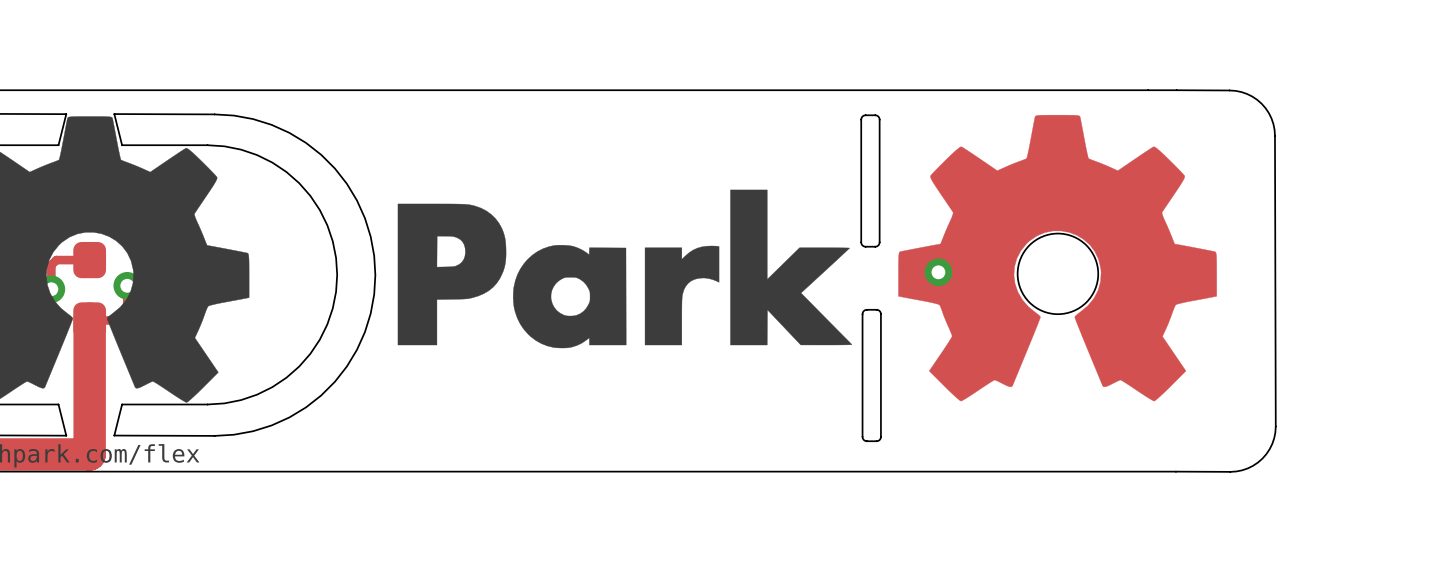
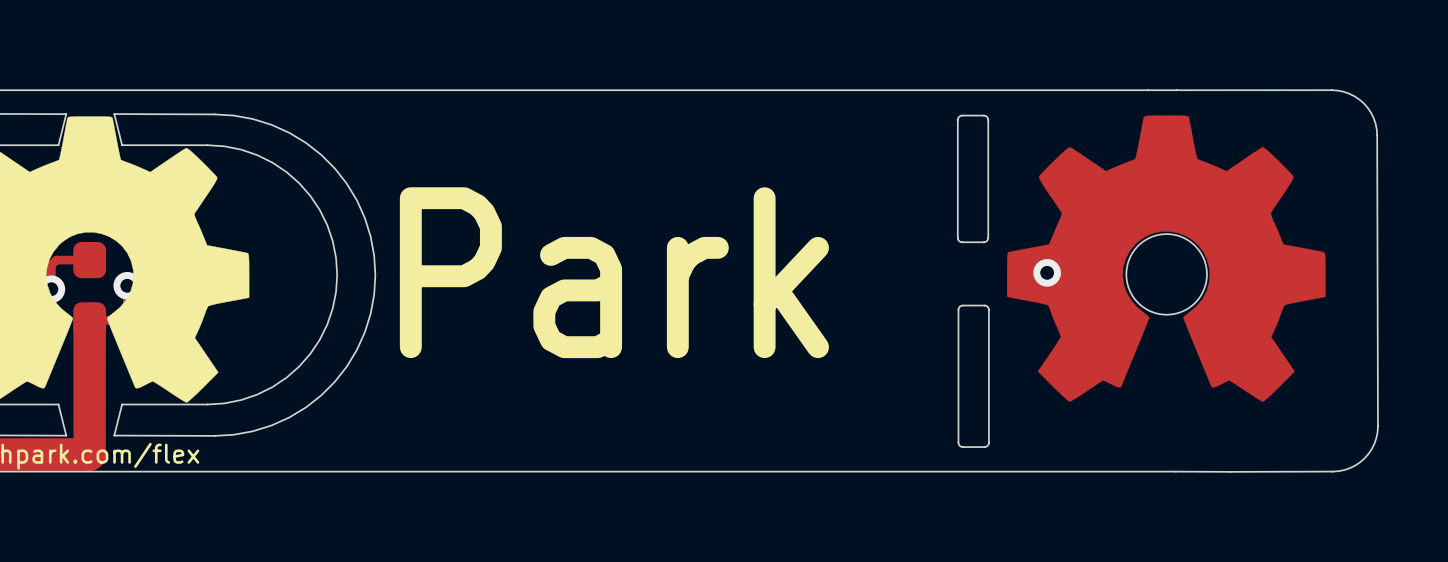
board edge: (1176, 90) (1229, 90) (1246, 93) (1257, 99) (1265, 108) (1271, 118) (1274, 129) (1275, 432) (1269, 449) (1258, 462) (1242, 470) (1230, 471) -> (1176, 90) (1337, 90) (1349, 93) (1363, 103) (1371, 112) (1376, 129) (1377, 426) (1374, 443) (1368, 453) (1360, 462) (1349, 468) (1338, 471) (1230, 471)
board edge: (865, 115) (876, 115) (879, 119) (879, 242) (875, 246) (864, 246) (861, 242) (861, 119) (865, 115) -> none
board edge: none -> (962, 115) (984, 115) (988, 119) (988, 237) (984, 242) (961, 242) (957, 238) (957, 119) (962, 115)
drawing: [397, 189, 852, 349] -> none
drawing position: (1057, 258) -> (1166, 258)
text: none -> Park (614, 272)
via position: (938, 272) -> (1047, 272)
round board edge position: (1057, 273) -> (1166, 274)
board edge: none -> (962, 305) (985, 305) (988, 309) (988, 442) (985, 447) (962, 447) (958, 443) (958, 309) (962, 305)
board edge: (866, 309) (877, 309) (880, 313) (880, 436) (877, 441) (865, 441) (862, 437) (862, 314) (866, 309) -> none

